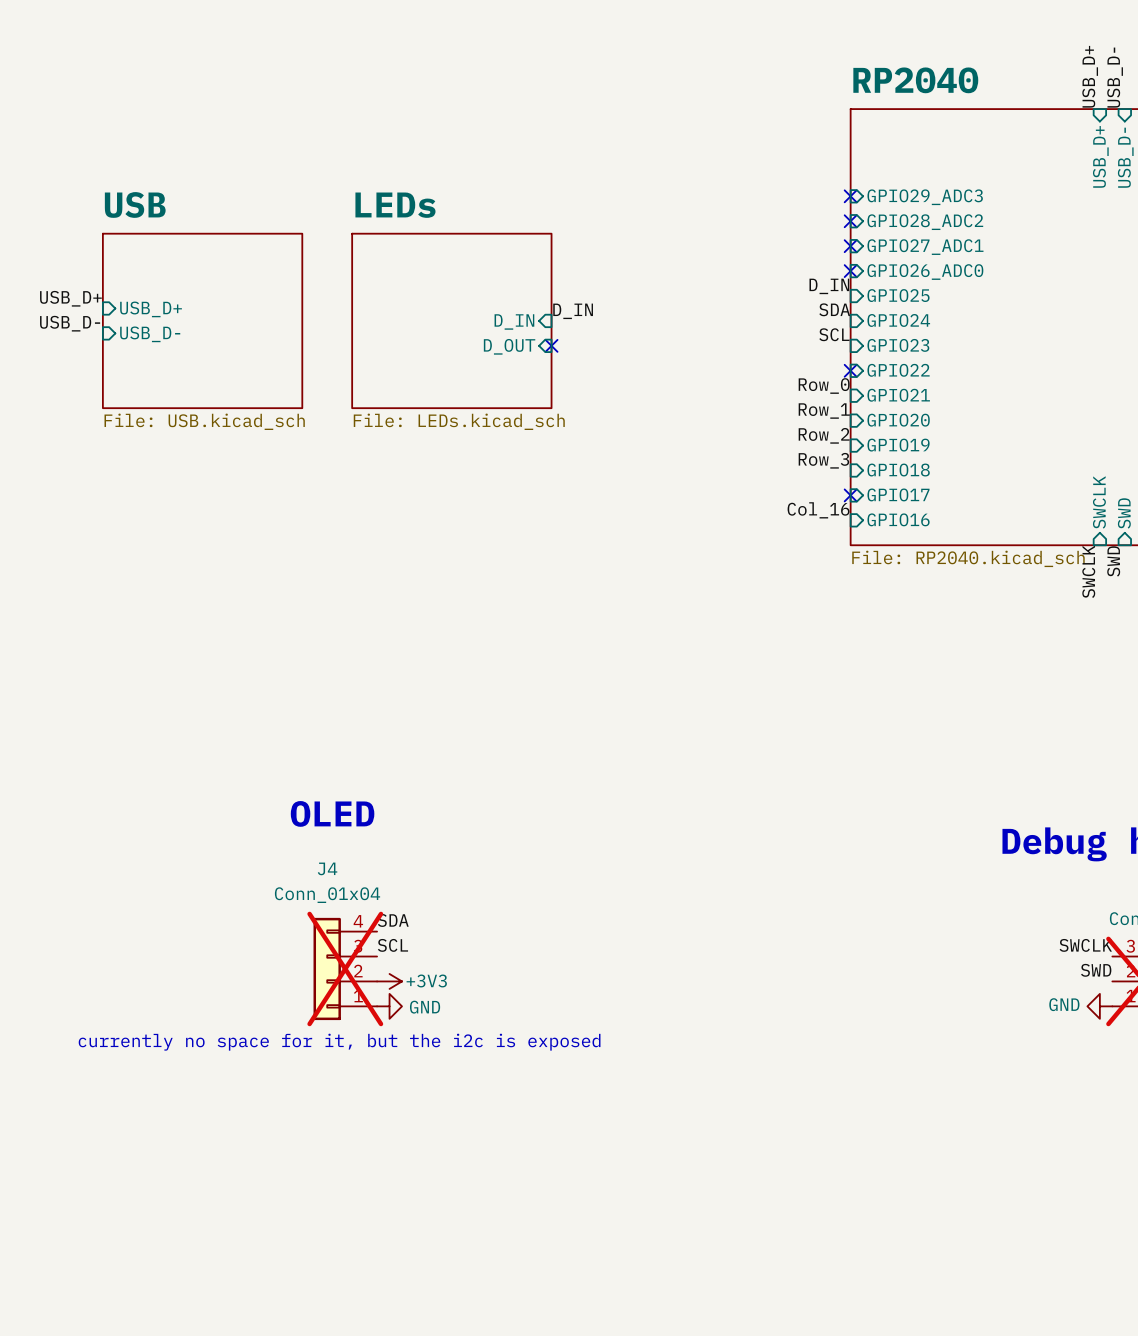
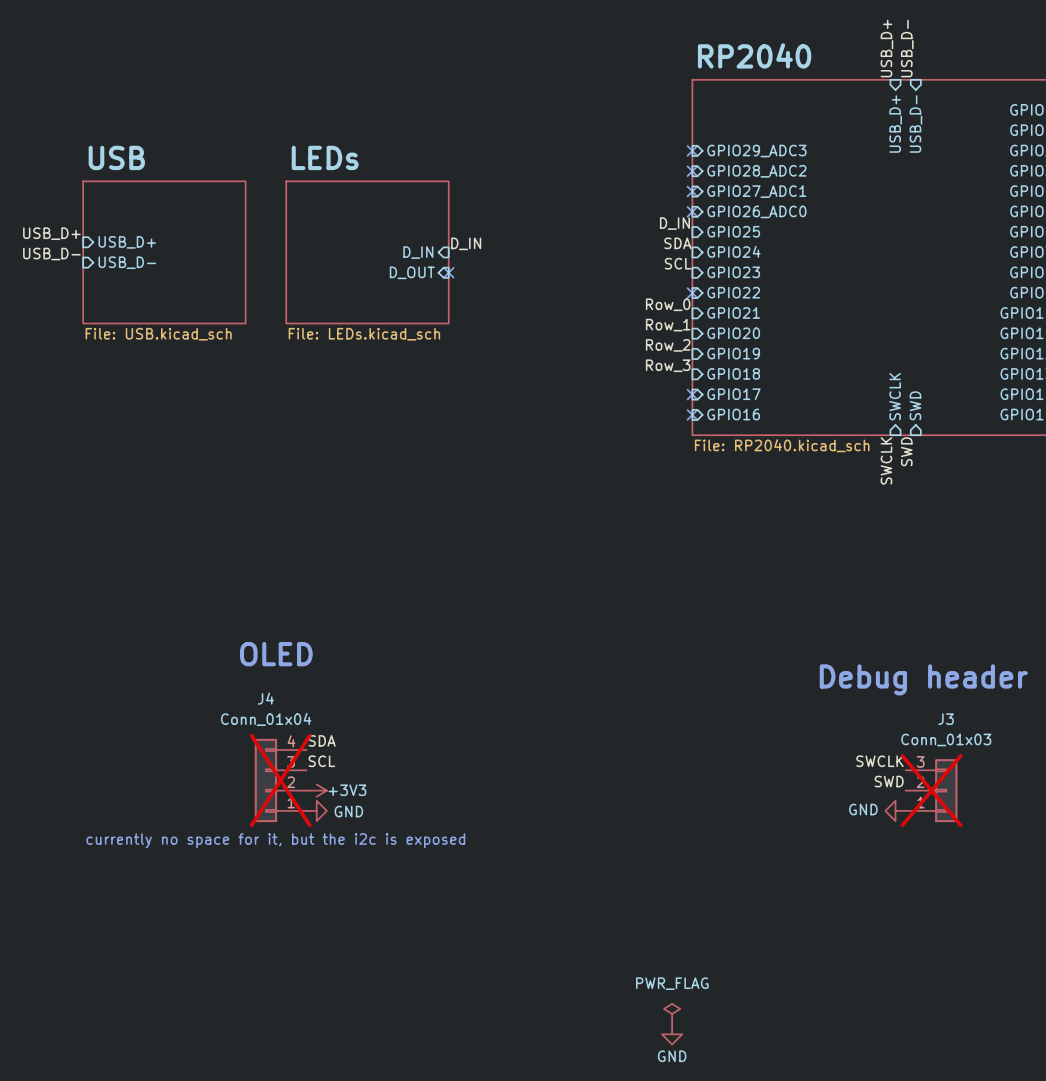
label: Col_16 (818, 510) -> none
no-connect mark: none -> (692, 414)
power symbol: none -> PWR_FLAG (672, 1014)
power symbol: none -> GND (672, 1034)

